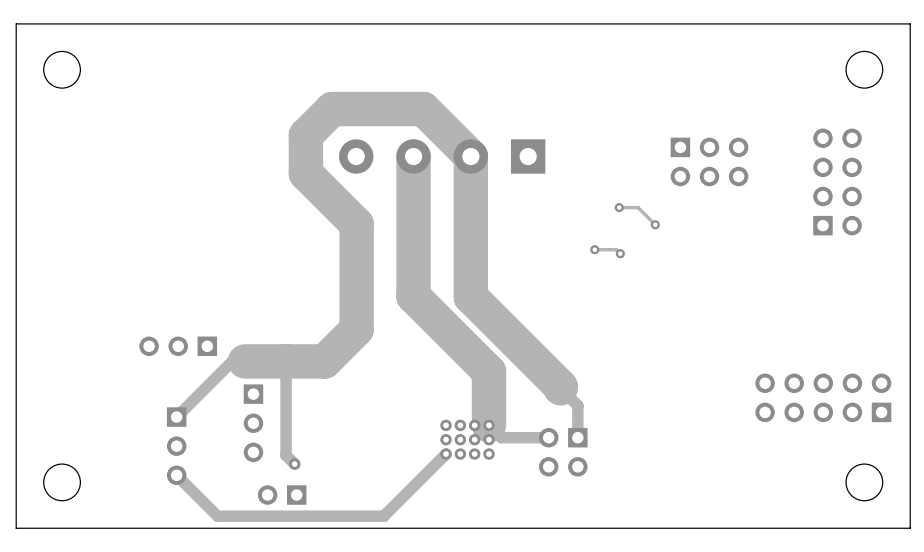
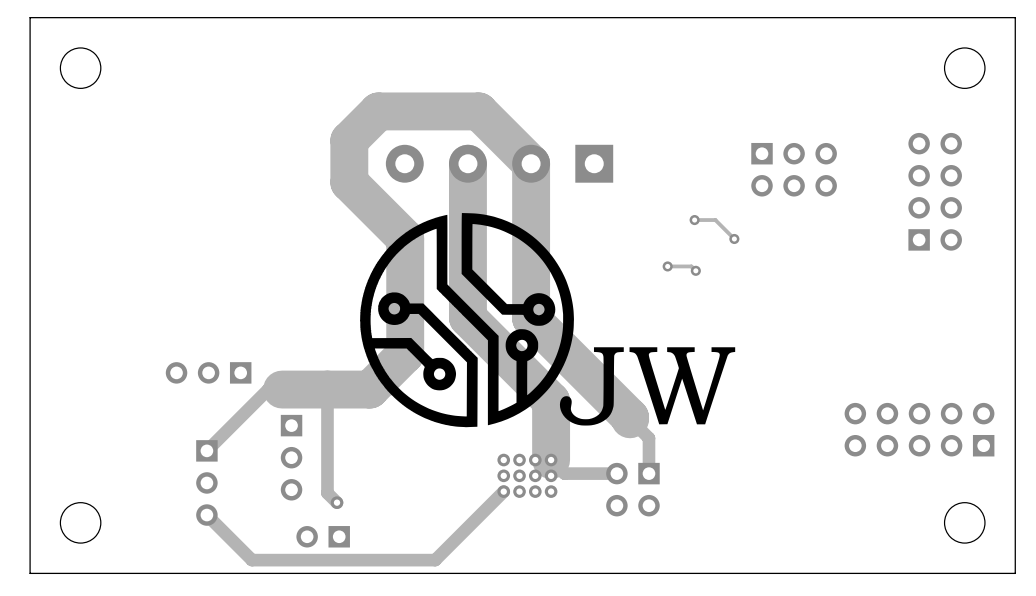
drawing: none -> [360, 213, 736, 428]

